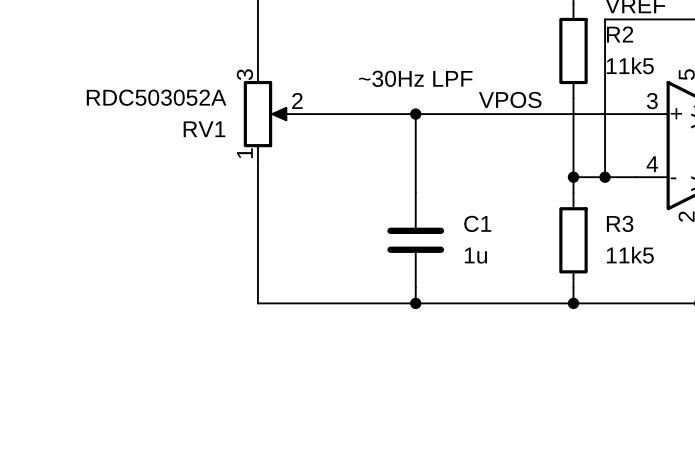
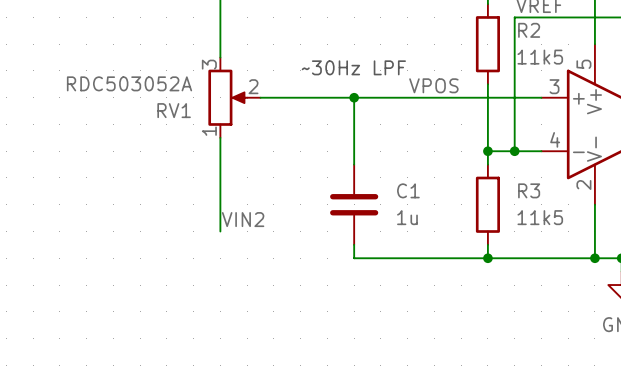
label: none -> VIN2 (243, 219)
wire: (257, 271) (257, 303) (415, 303) -> none
junction: (415, 303) -> none

